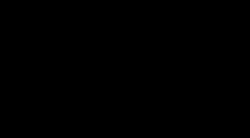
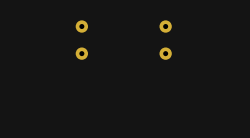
part: none -> (81, 40)
part: none -> (165, 40)

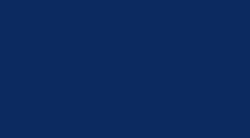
part: (81, 40) -> none
part: (165, 40) -> none

